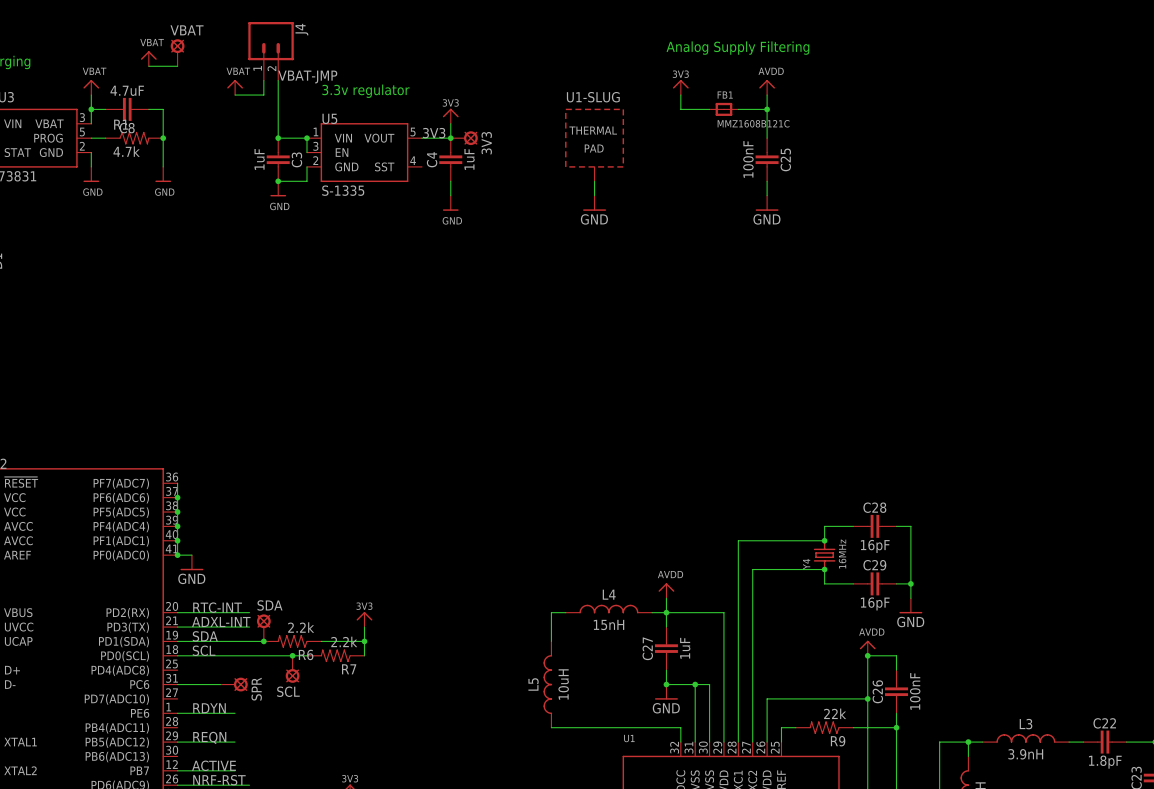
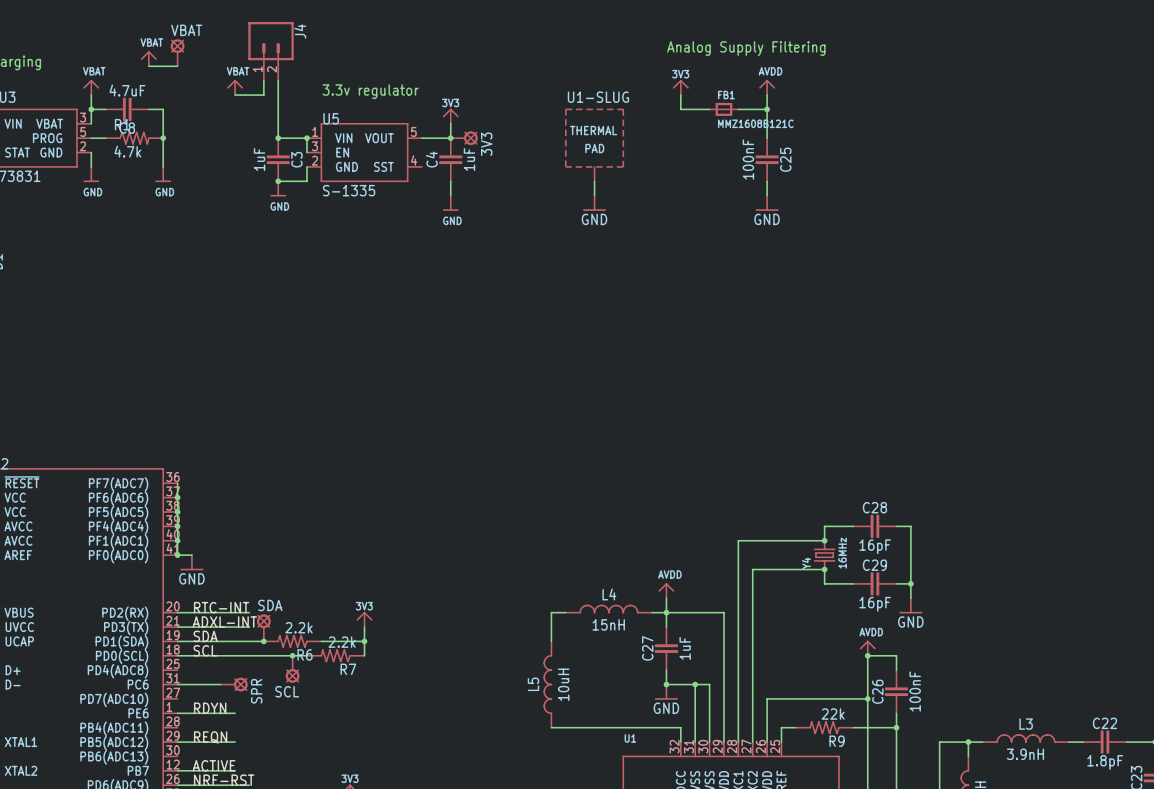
label: VBAT-JMP (307, 77) -> none
label: 3V3 (434, 133) -> none

